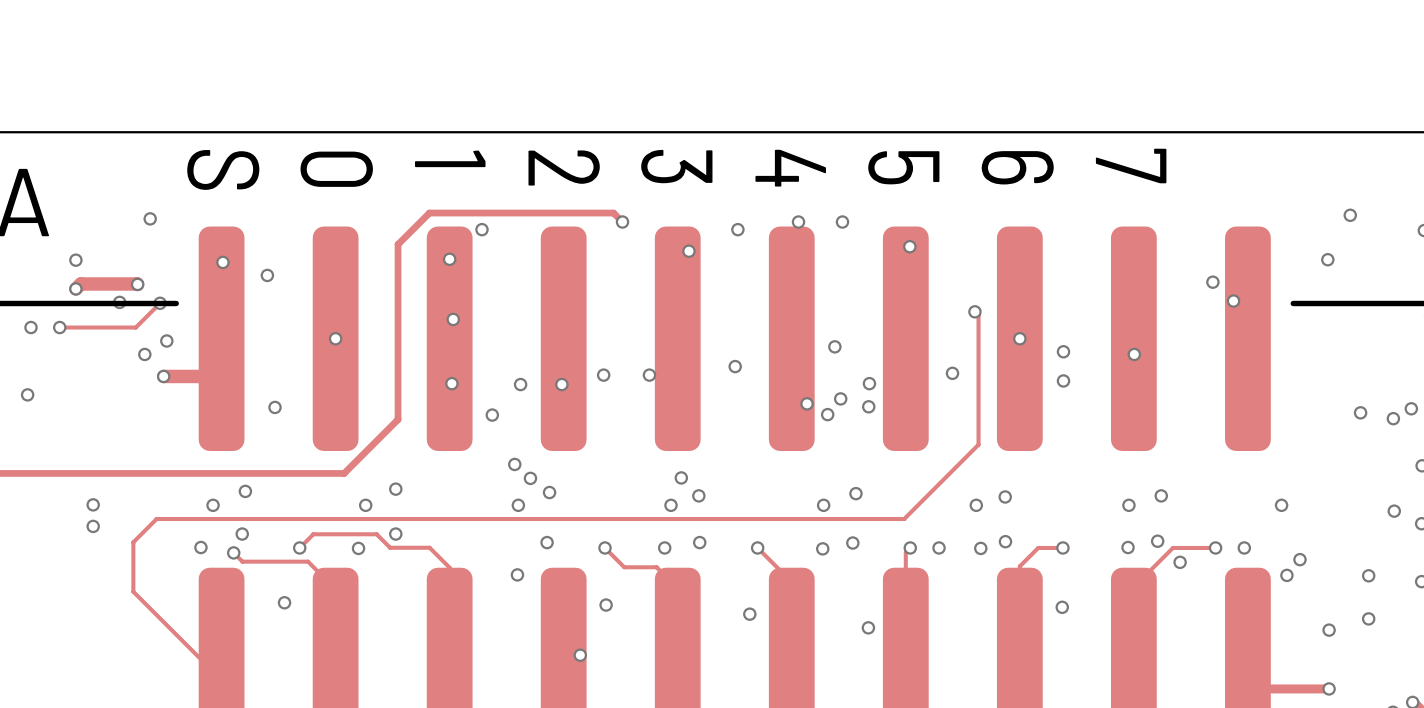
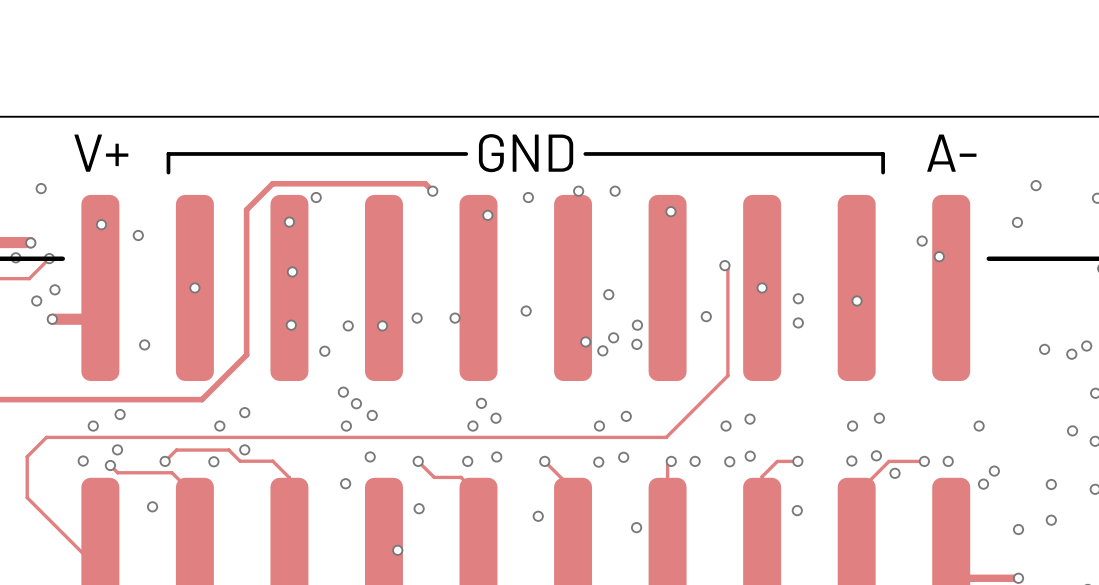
text: 1 (450, 158) -> none
text: 7 (1131, 165) -> none
text: 3 (676, 166) -> none
text: 5 (903, 167) -> none
text: 6 (1017, 167) -> none
text: 2 (564, 168) -> none
text: 4 (790, 168) -> none
text: S (223, 169) -> none
text: 0 (336, 169) -> none
text: none -> V+ (101, 153)
text: none -> GND (526, 153)
text: none -> A- (951, 153)
line: none -> (466, 153) (168, 153) (168, 172)
line: none -> (585, 153) (883, 153) (883, 172)

